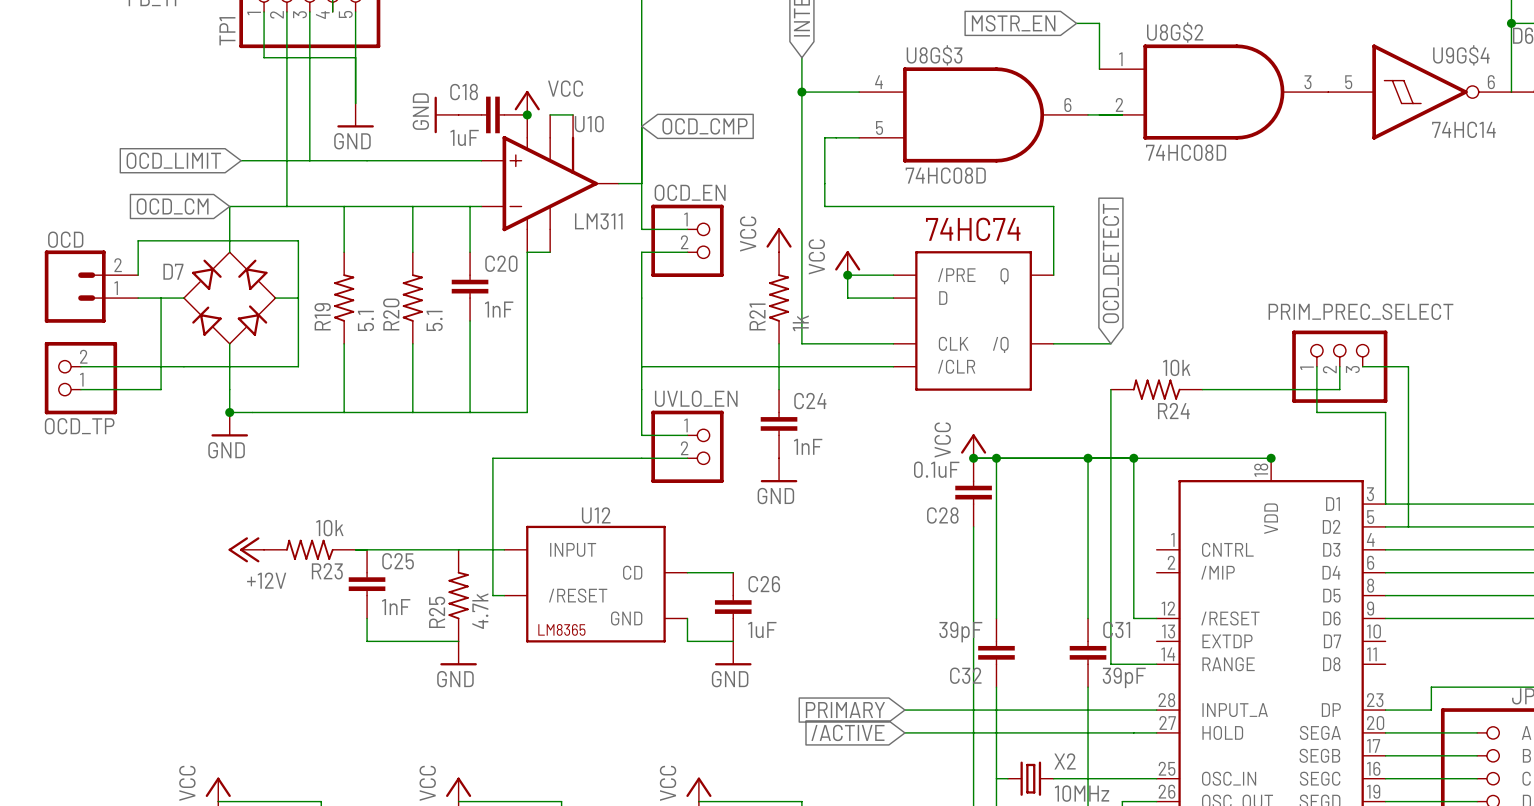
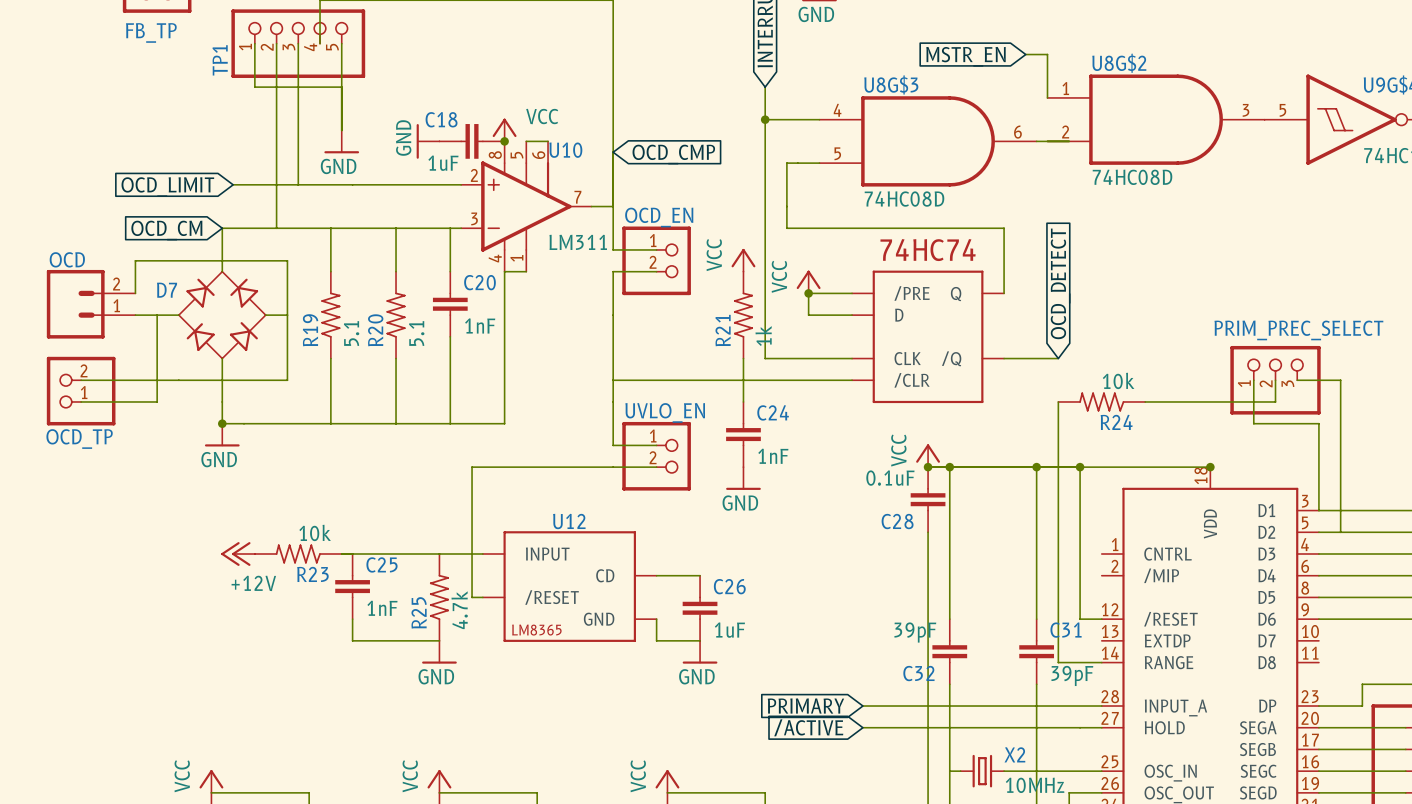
U10 pin number: none -> 8 (495, 155)
U10 pin number: none -> 5 (516, 155)
U10 pin number: none -> 6 (538, 155)
U10 pin number: none -> 2 (474, 175)
U10 pin number: none -> 7 (577, 197)
U10 pin number: none -> 3 (474, 218)
U10 pin number: none -> 1 (516, 258)
U10 pin number: none -> 4 (495, 258)

